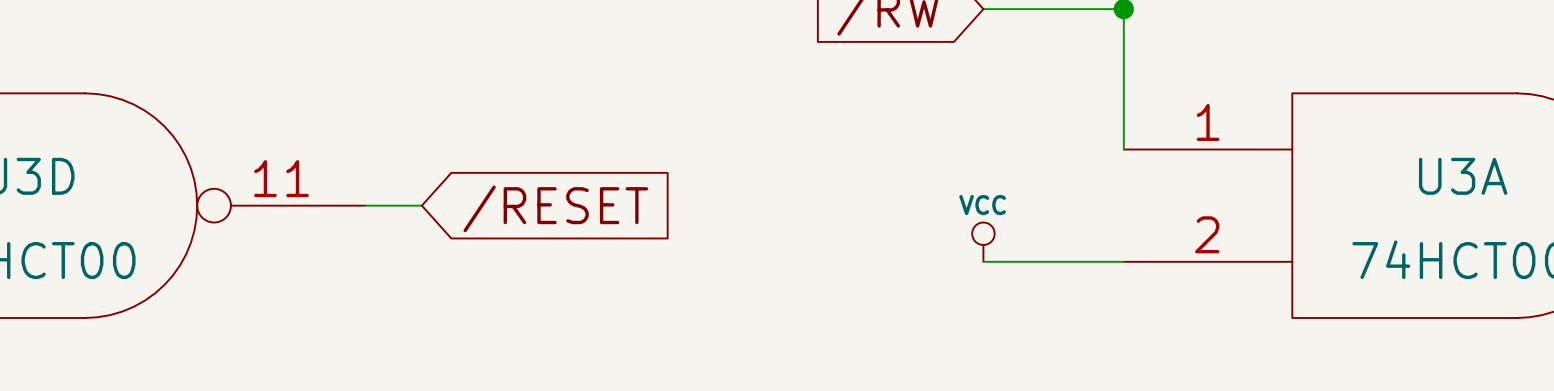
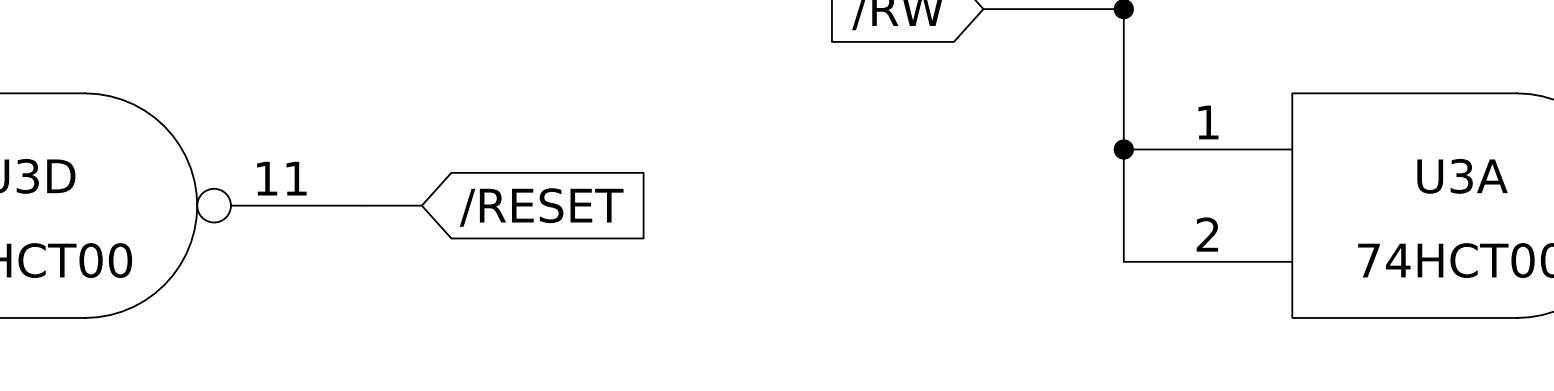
junction: none -> (1123, 149)
power symbol: VCC (983, 242) -> none
wire: (983, 261) (1123, 261) -> (1123, 149) (1123, 261)

